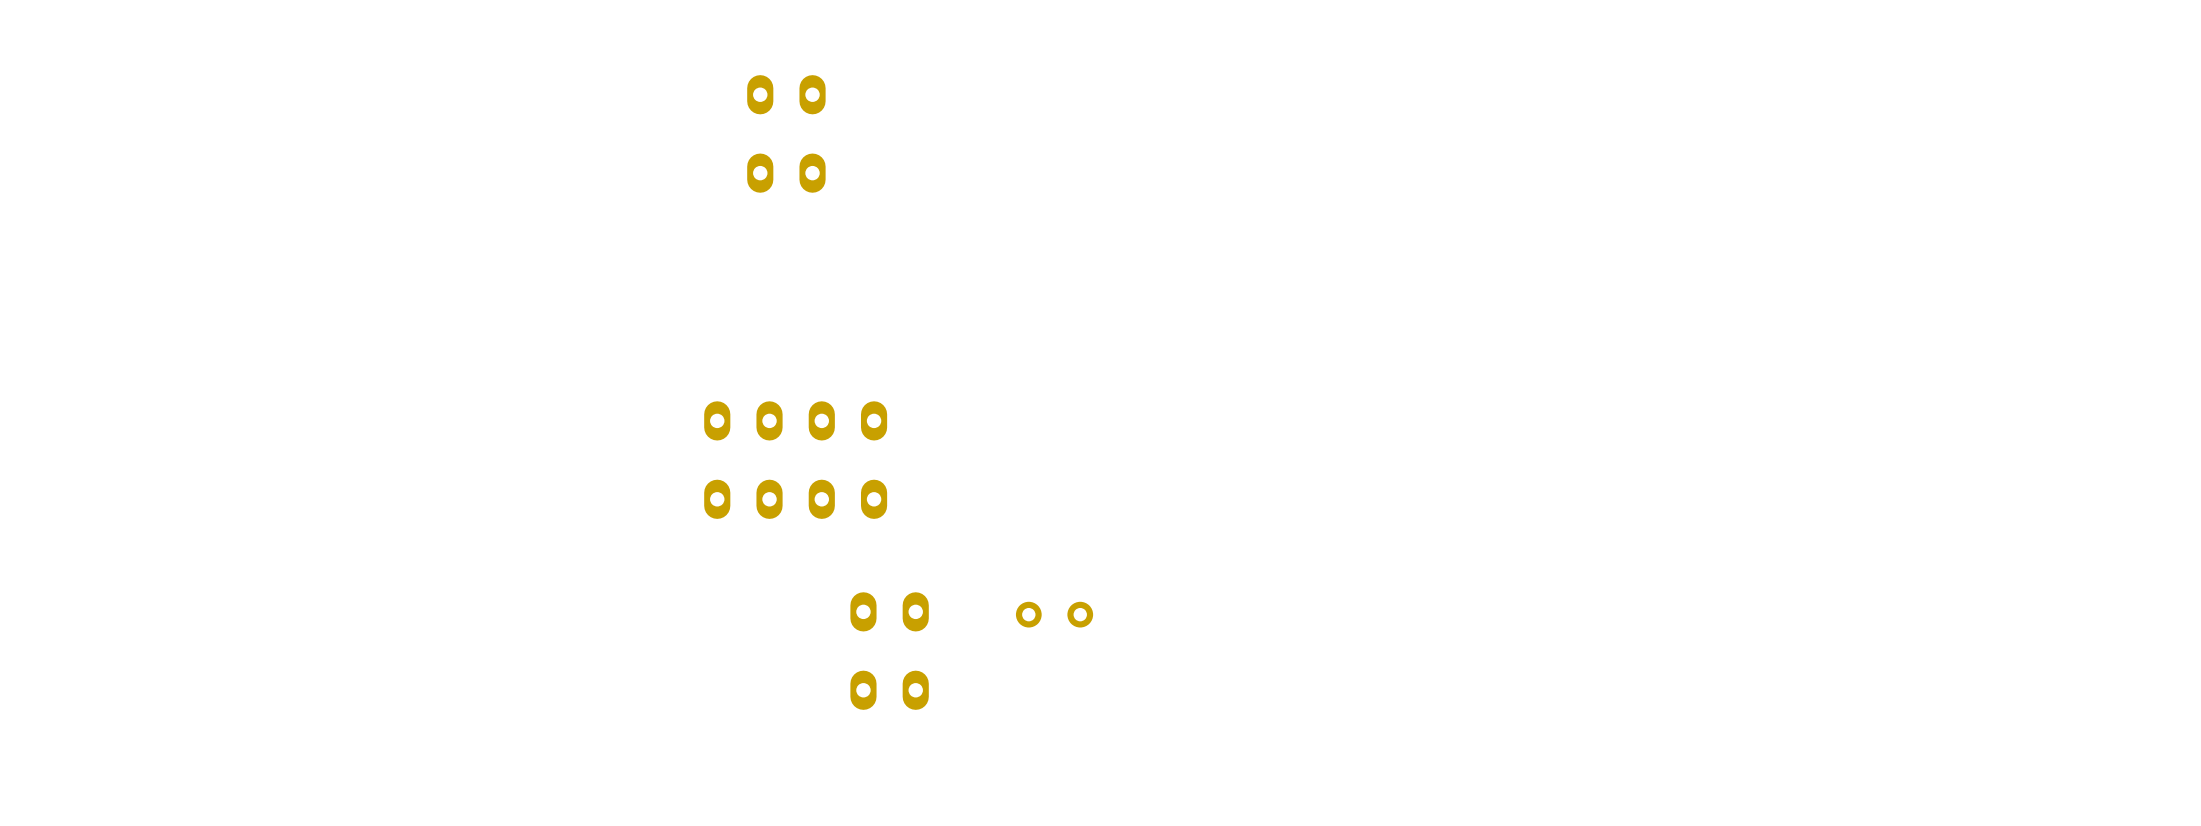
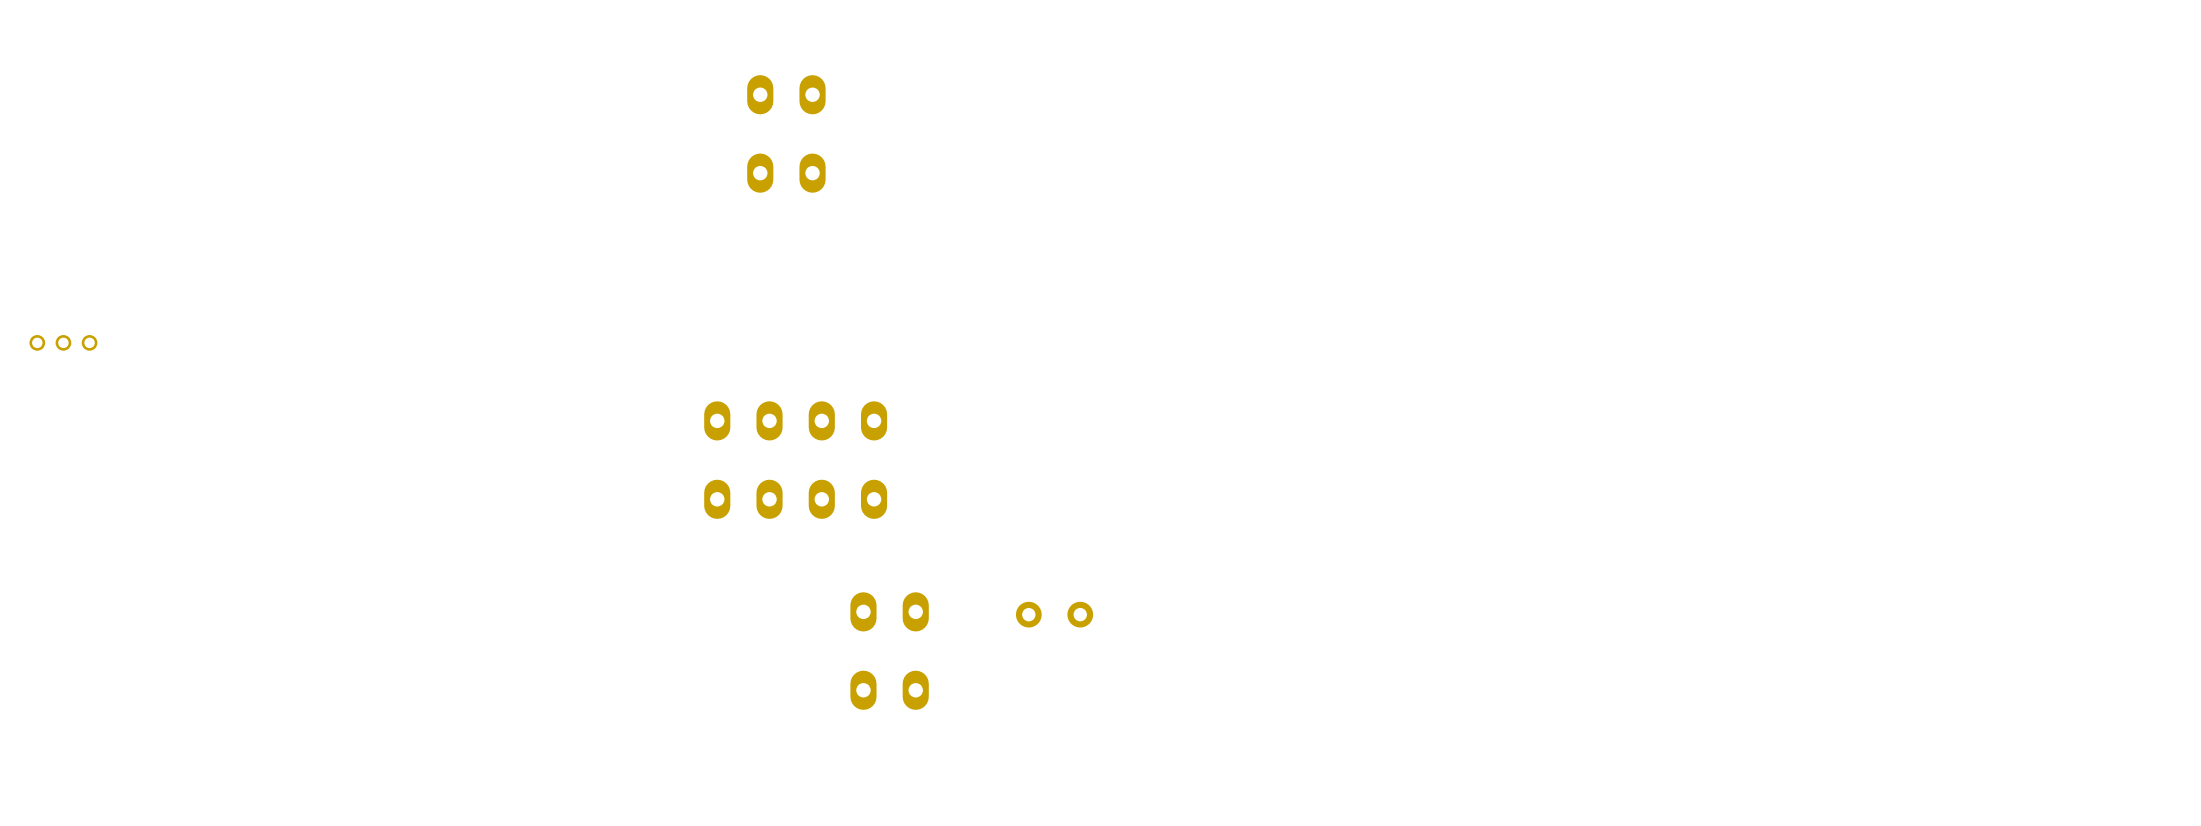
part: none -> (63, 342)

